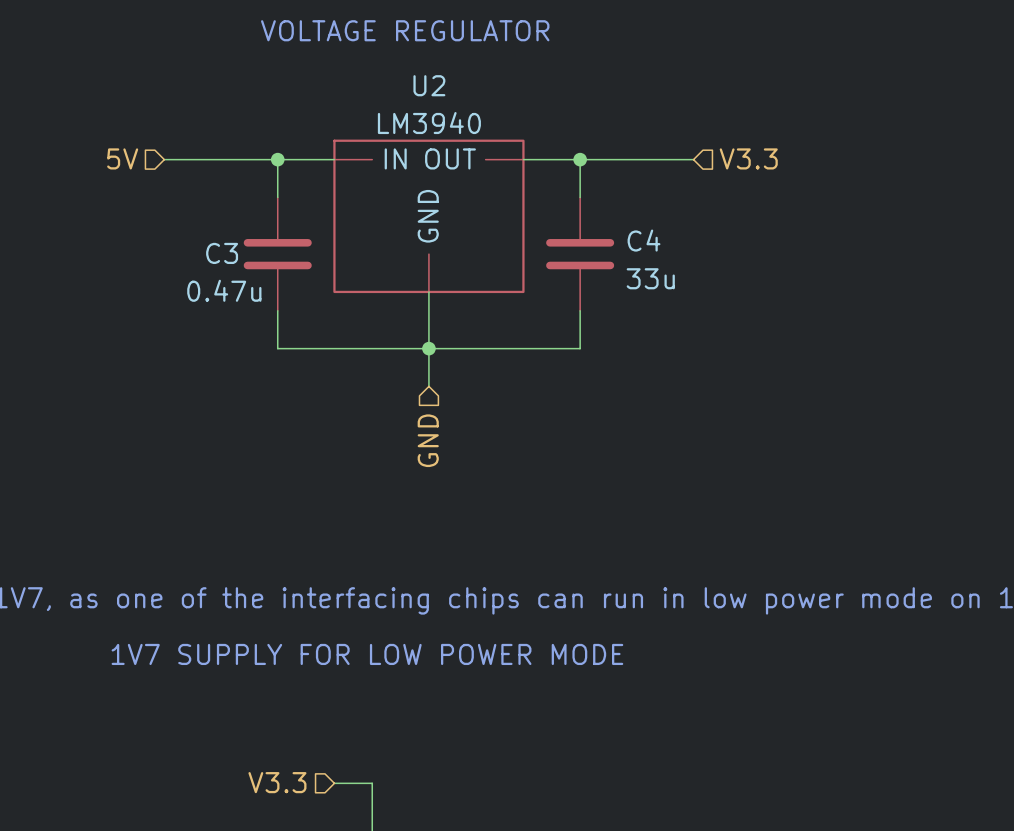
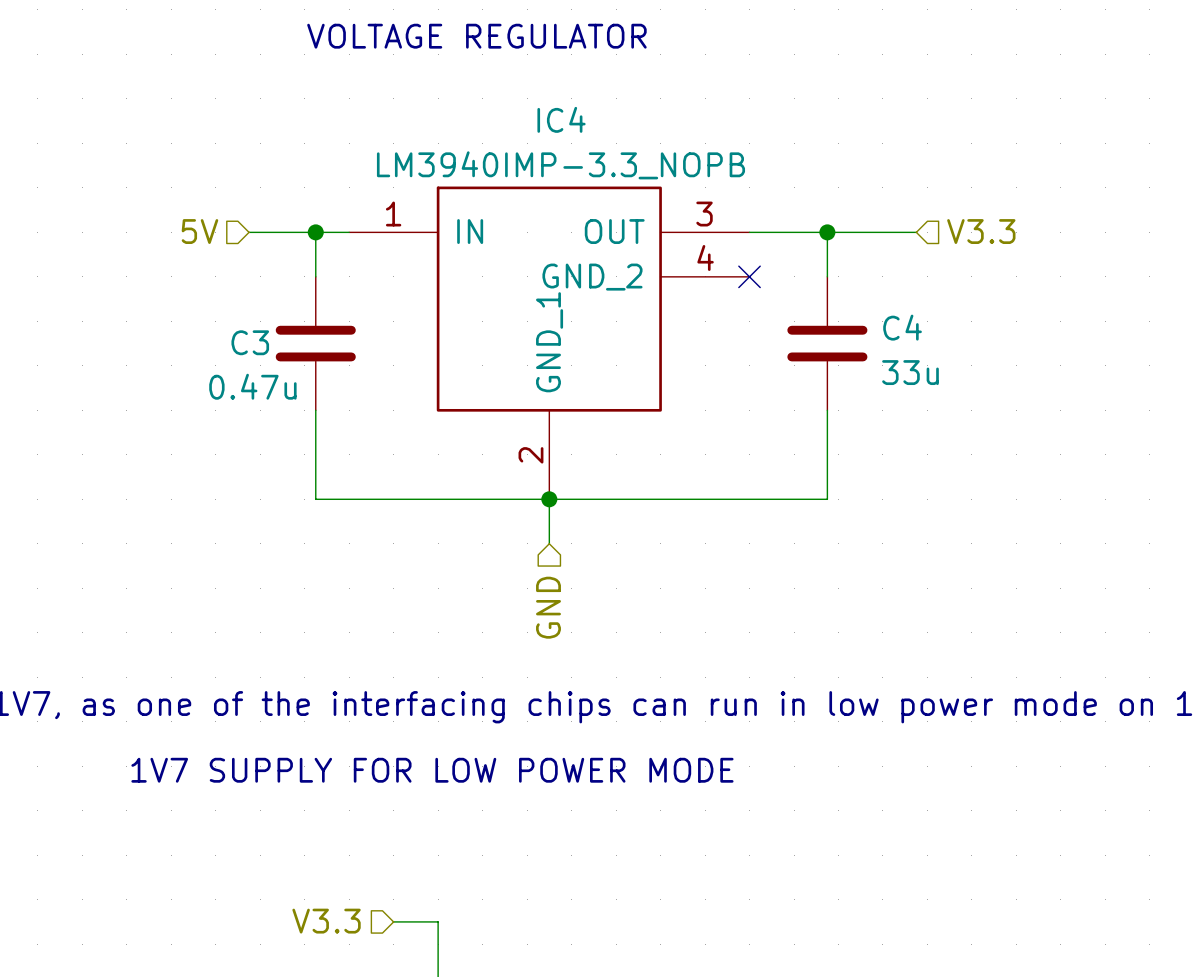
hierarchical label position: 5V (122, 158) -> 5V (199, 231)
hierarchical label position: V3.3 (748, 158) -> V3.3 (981, 231)
wire: (164, 159) (334, 159) -> none
wire: (277, 159) (277, 197) -> (315, 232) (315, 276)
junction position: (277, 159) -> (315, 232)
wire: (523, 159) (693, 159) -> none
wire: (580, 159) (580, 197) -> (827, 232) (827, 276)
junction: (580, 159) -> none
wire: none -> (249, 232) (349, 232)
wire: none -> (749, 232) (916, 232)
junction: none -> (827, 232)
U2: LM3940 (428, 216) -> none
no-connect mark: none -> (749, 276)
C3 position: (277, 254) -> (315, 343)
C4 position: (580, 254) -> (827, 343)
wire: (428, 291) (428, 386) -> none
IC4: none -> LM3940IMP-3.3_NOPB (549, 342)
wire: (277, 310) (277, 348) (580, 348) (580, 310) -> none
wire: none -> (315, 410) (315, 499) (827, 499) (827, 410)
junction position: (428, 348) -> (549, 499)
wire: none -> (549, 499) (549, 543)
hierarchical label position: GND (428, 440) -> GND (548, 607)

